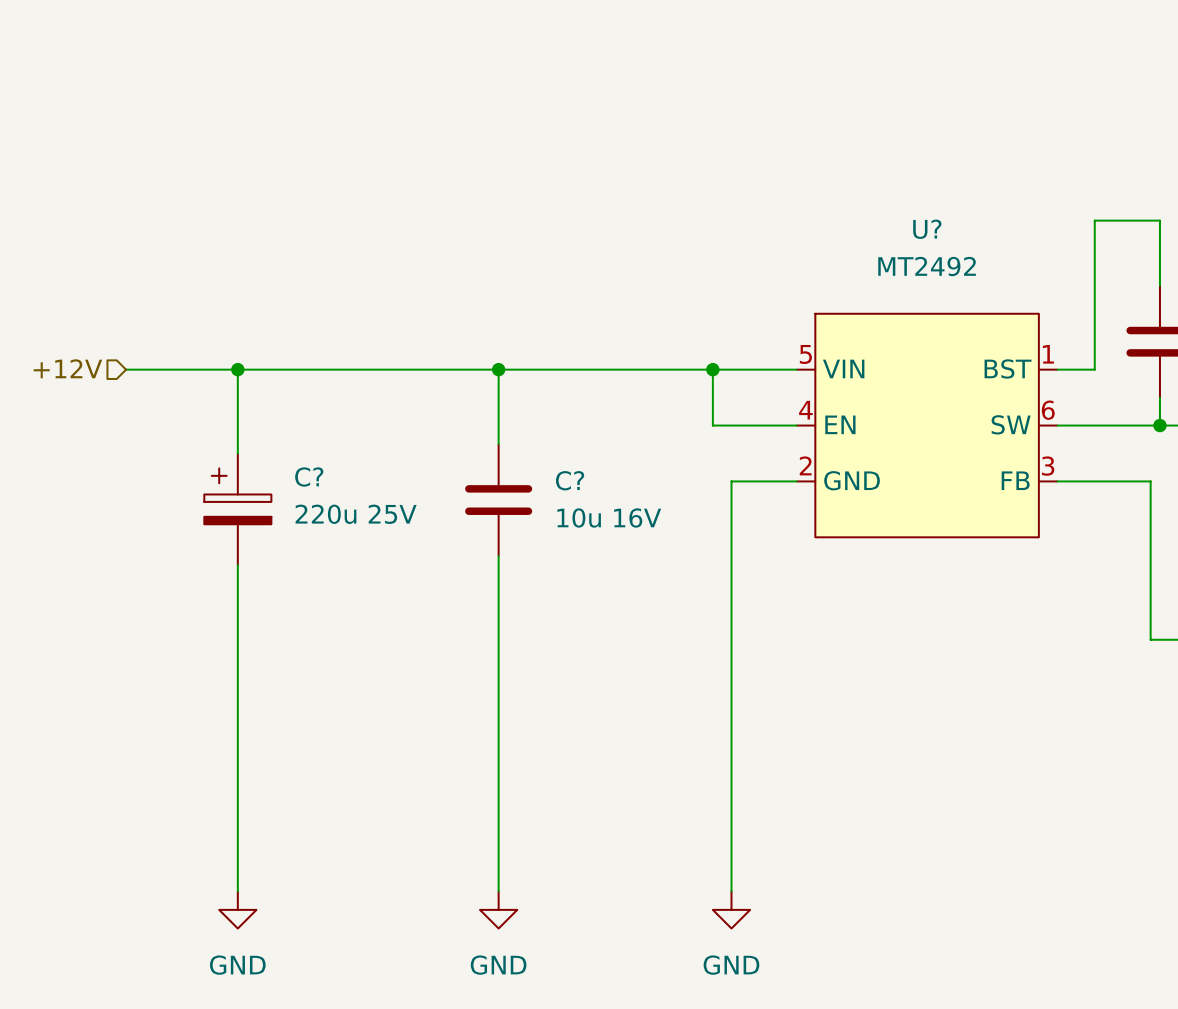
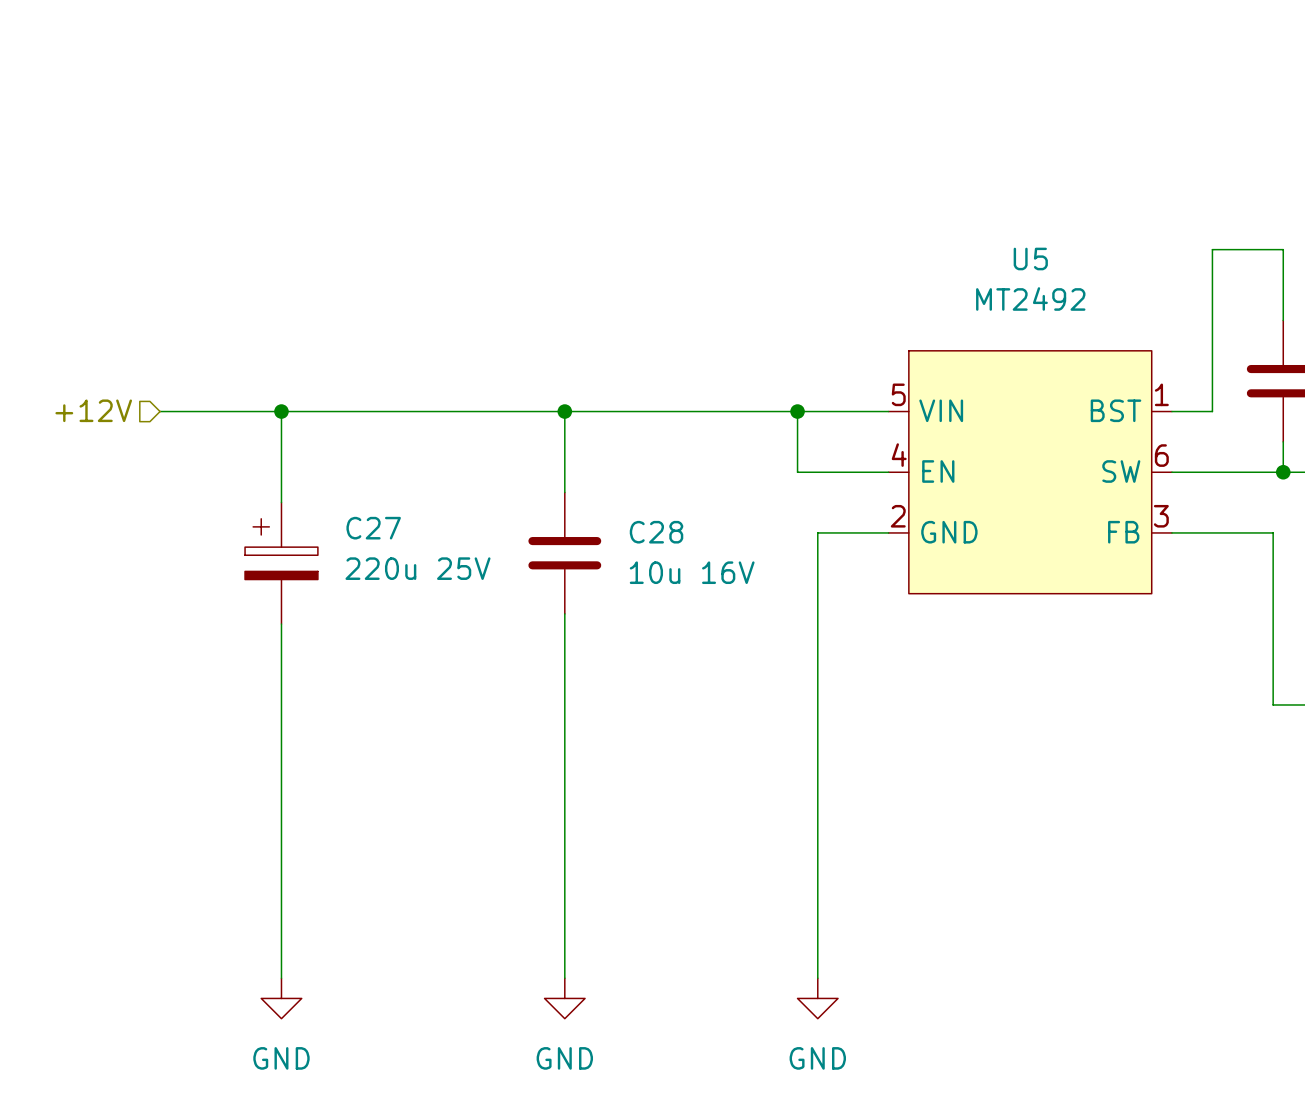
U? name: U? (927, 229) -> U5 (1030, 258)
C? name: C? (309, 477) -> C27 (373, 528)
C? name: C? (570, 480) -> C28 (656, 532)

